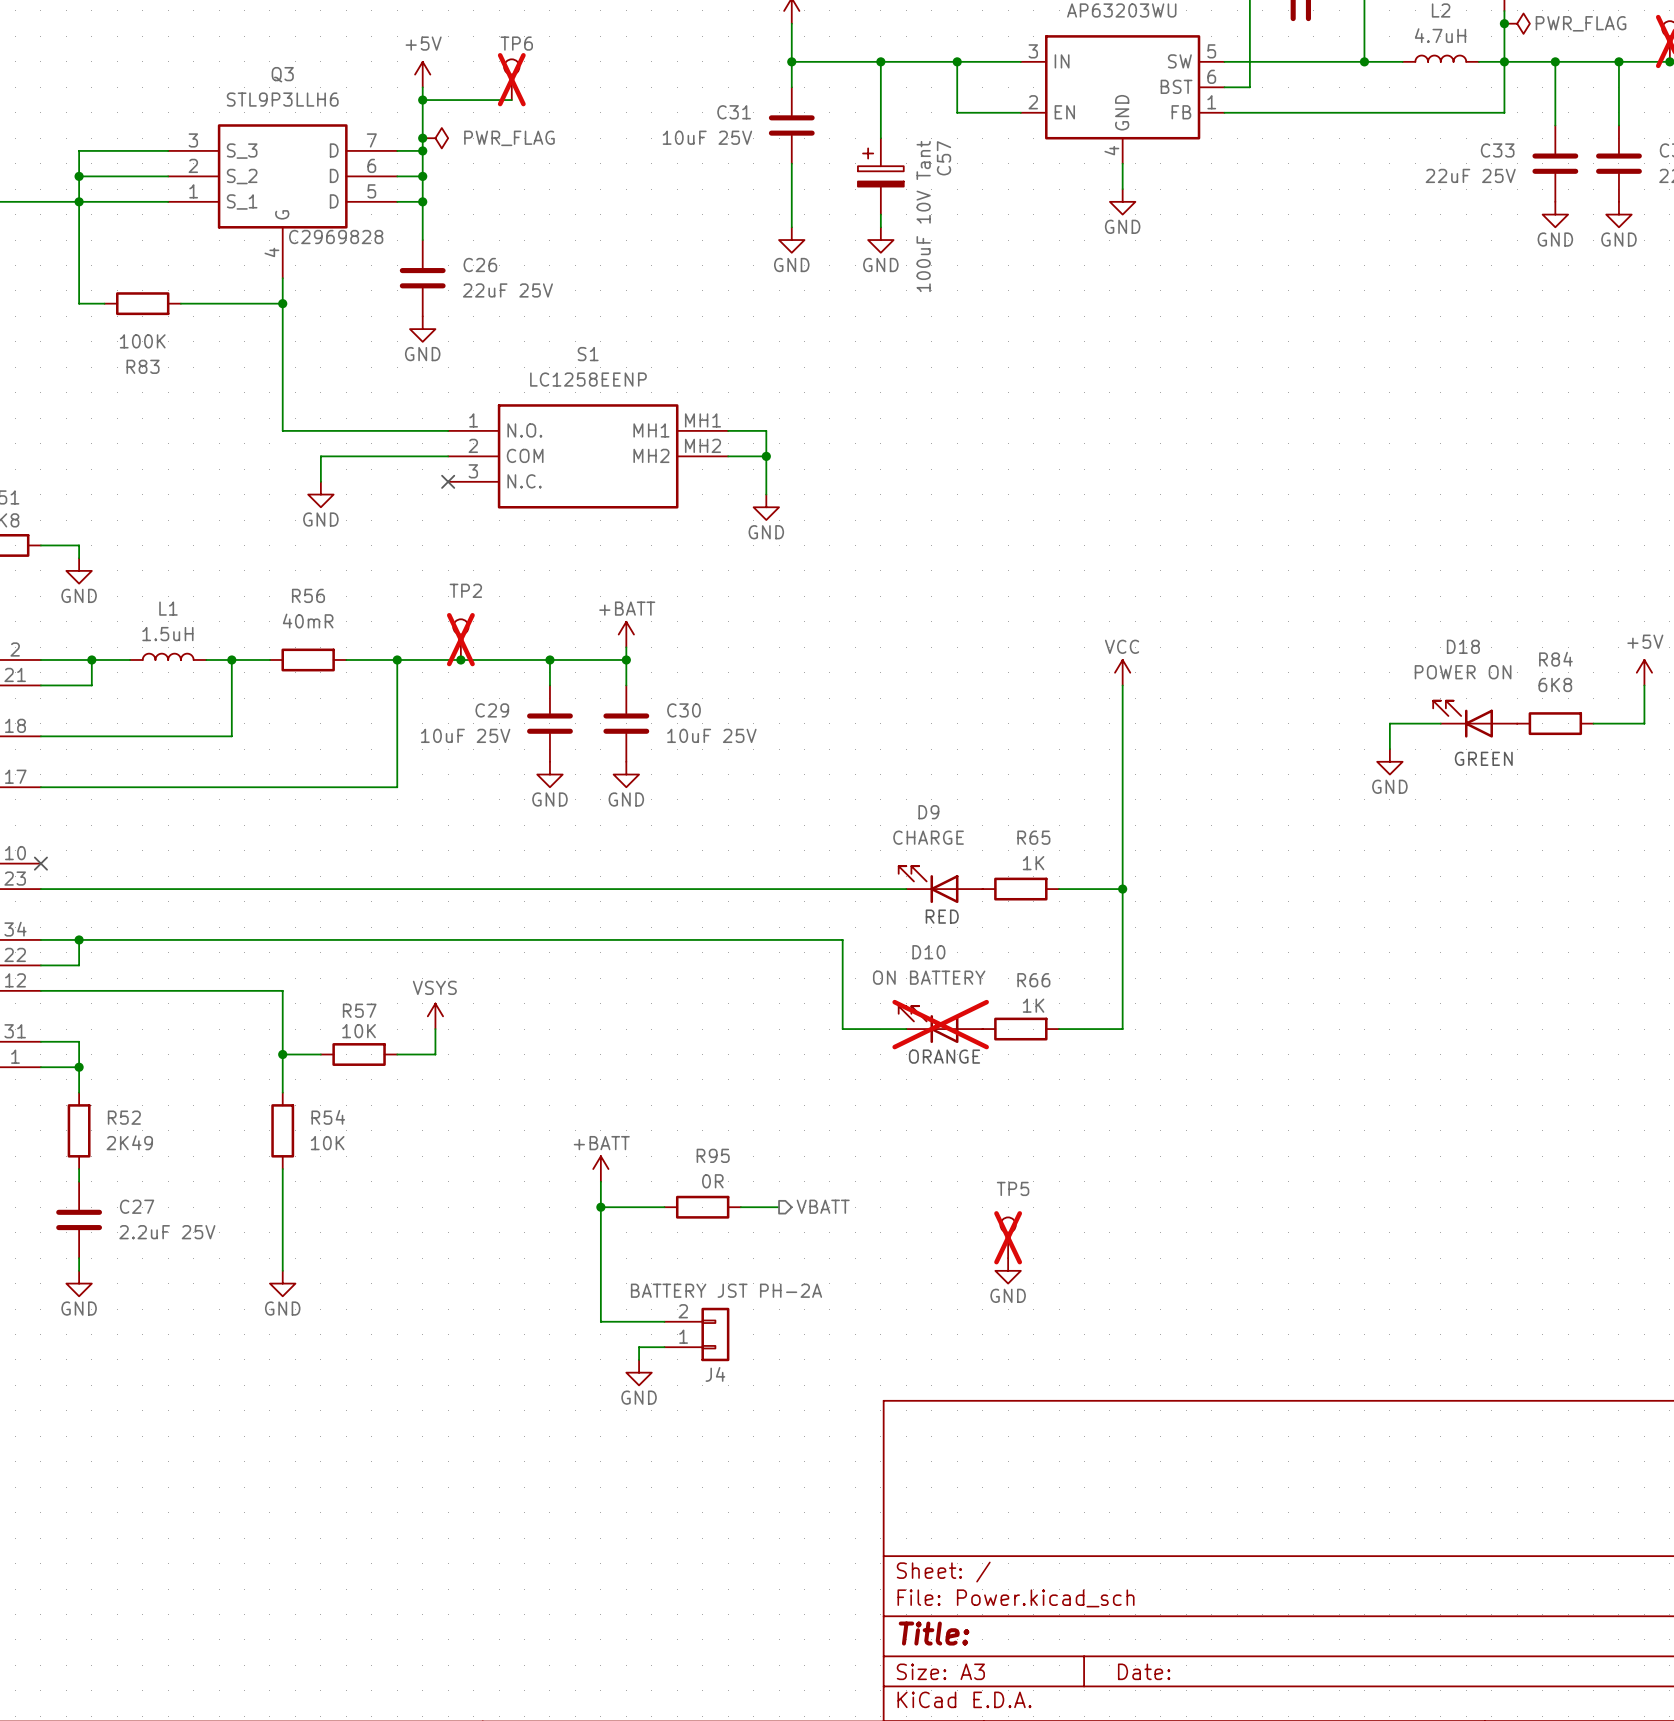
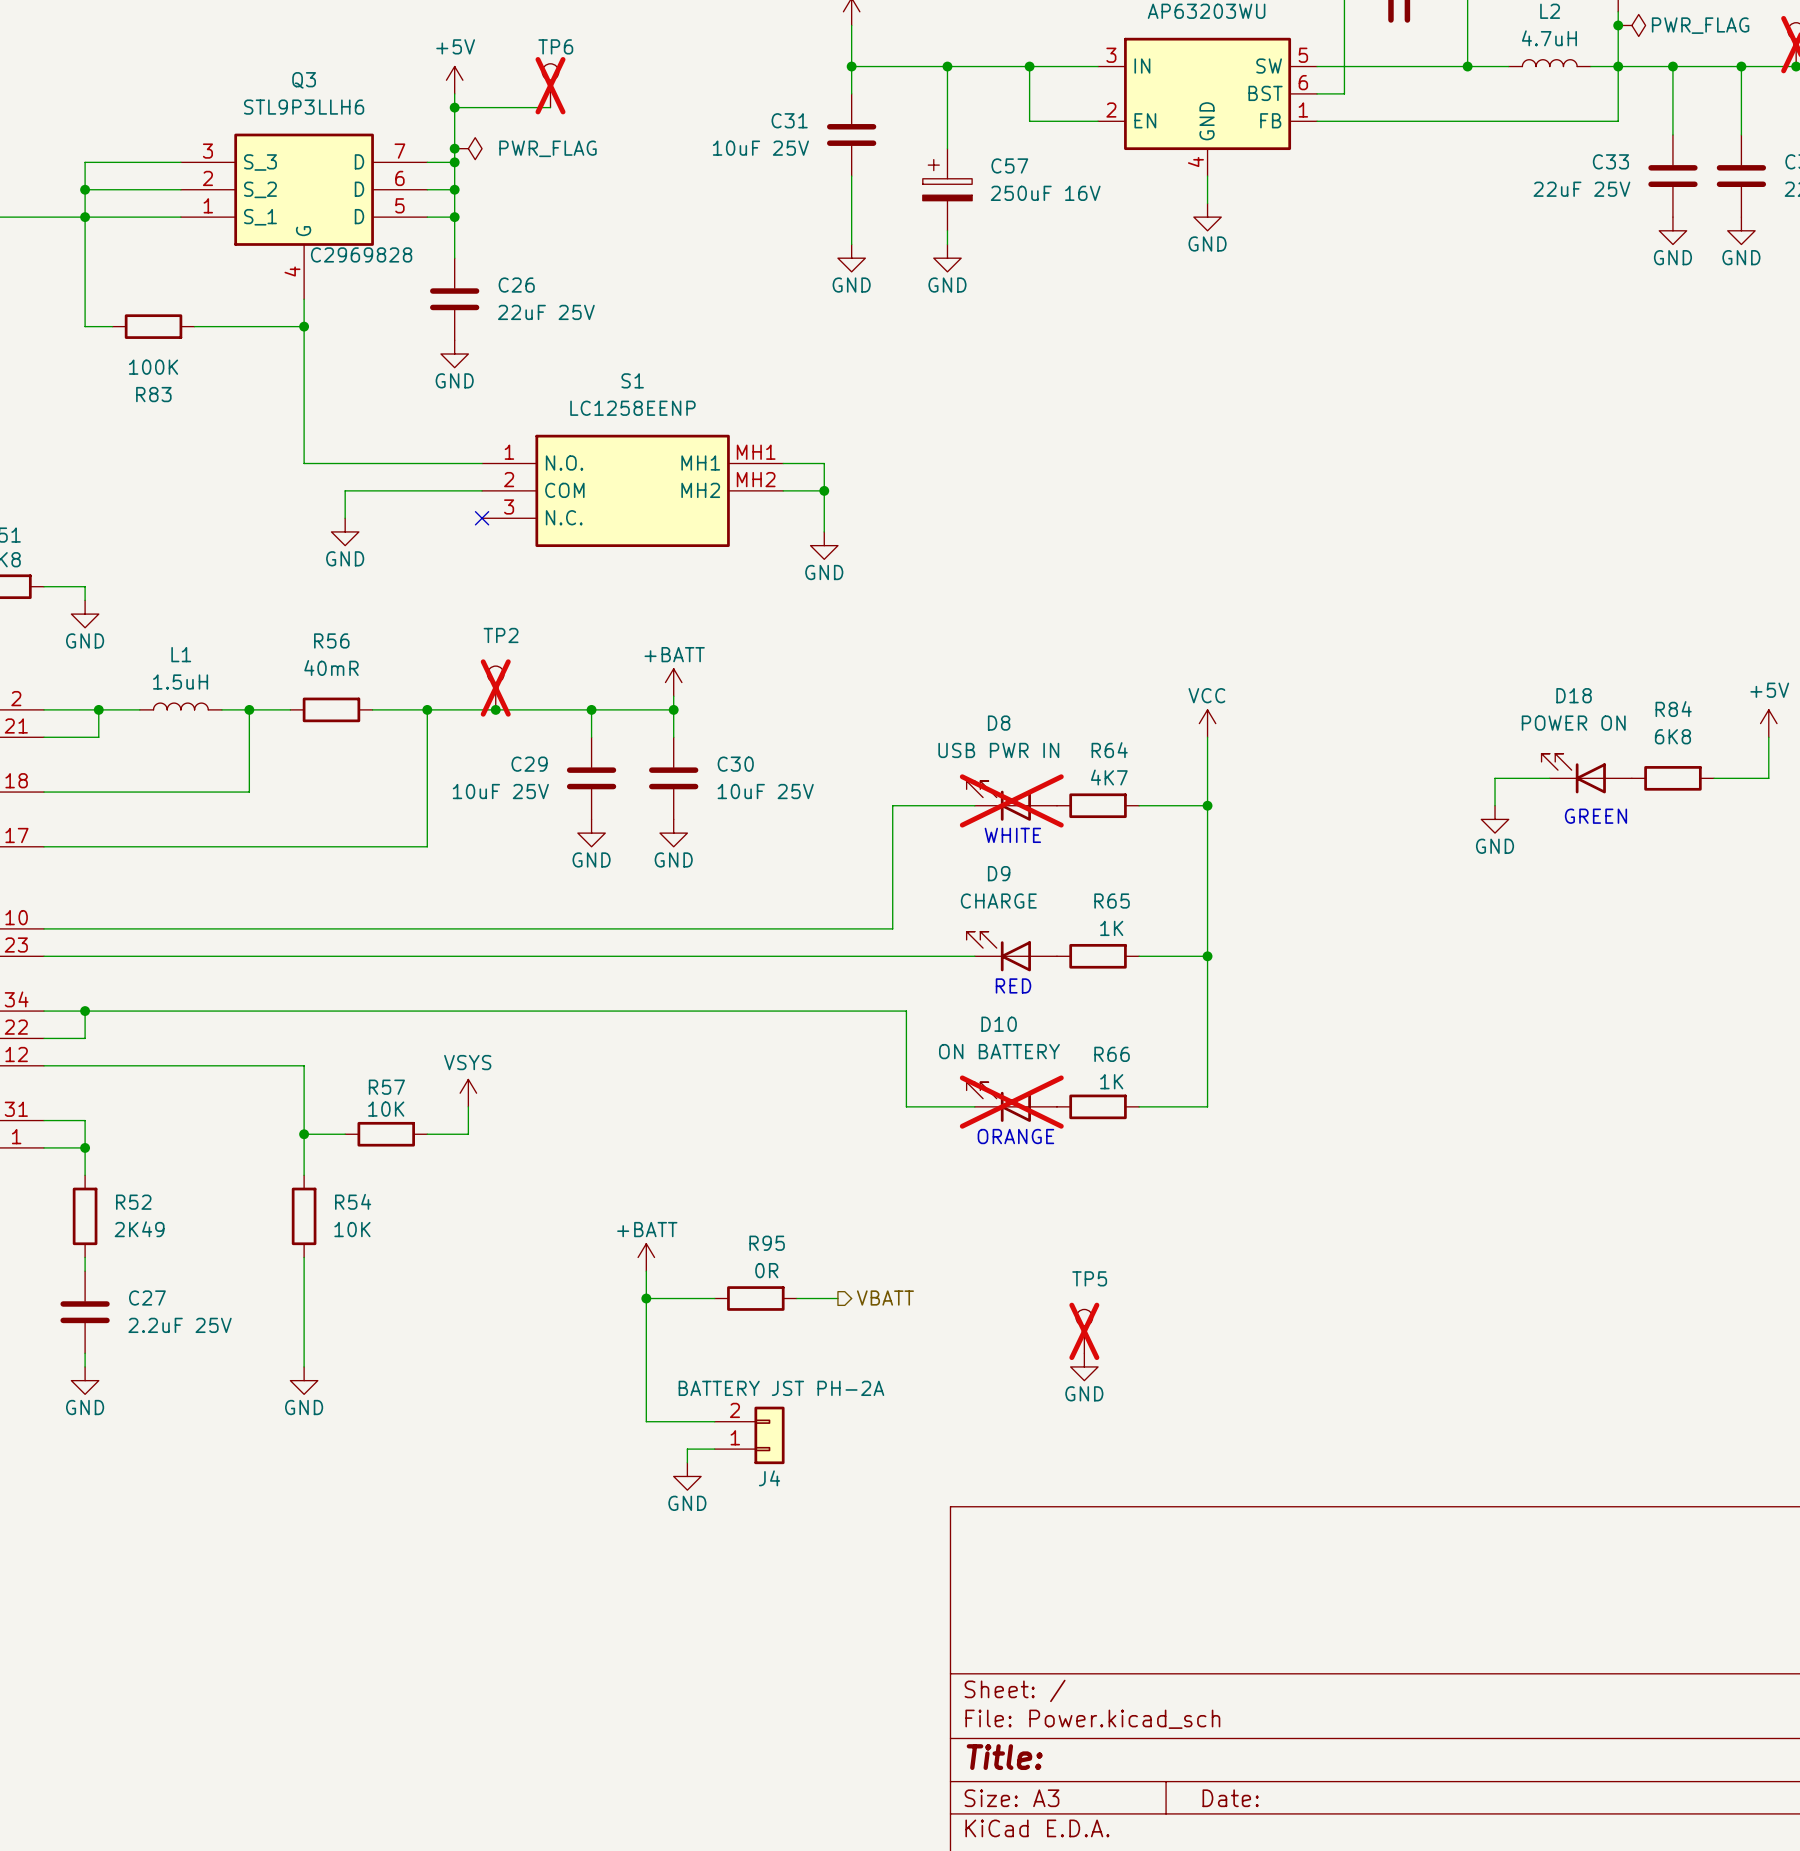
C57 name rotation: 0° (944, 158) -> 90° clockwise (1009, 165)
C57 value: 100uF 10V Tant (923, 216) -> 250uF 16V (1045, 193)
D8: none -> USB PWR IN (1011, 800)
wire: none -> (974, 805) (892, 805) (892, 928) (44, 928)
R64: none -> 4K7 (1098, 805)
wire: none -> (1139, 805) (1207, 805)
junction: none -> (1207, 805)
text: none -> WHITE (1012, 835)
no-connect mark: (40, 863) -> none

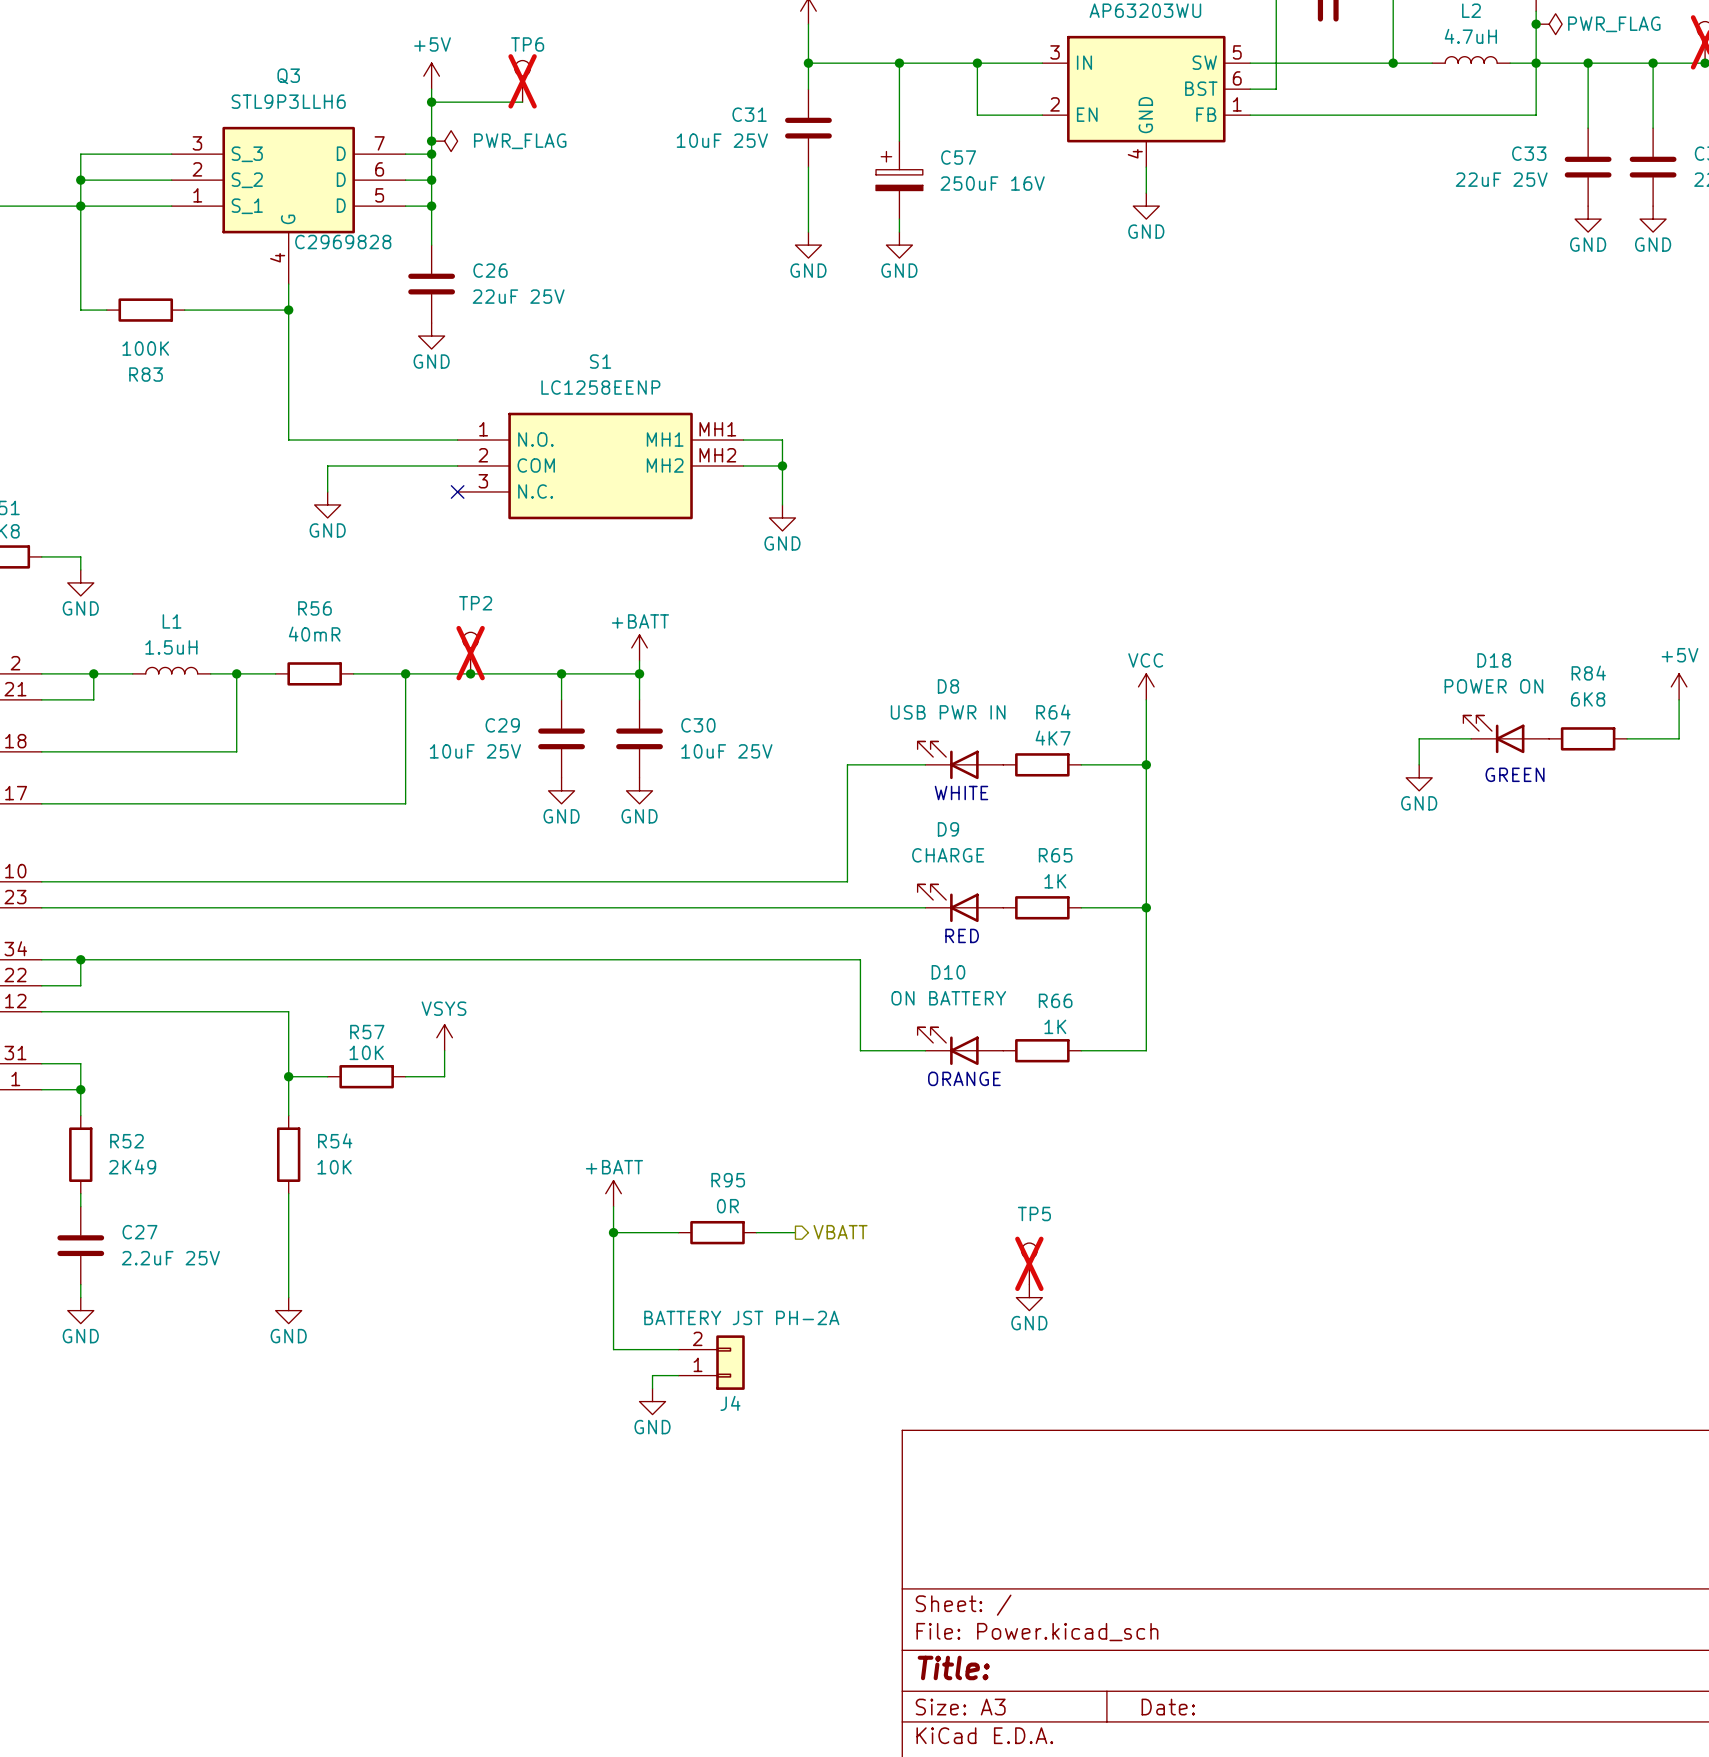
D8 do-not-place cross: (1011, 800) -> none
D10 do-not-place cross: (1011, 1102) -> none

